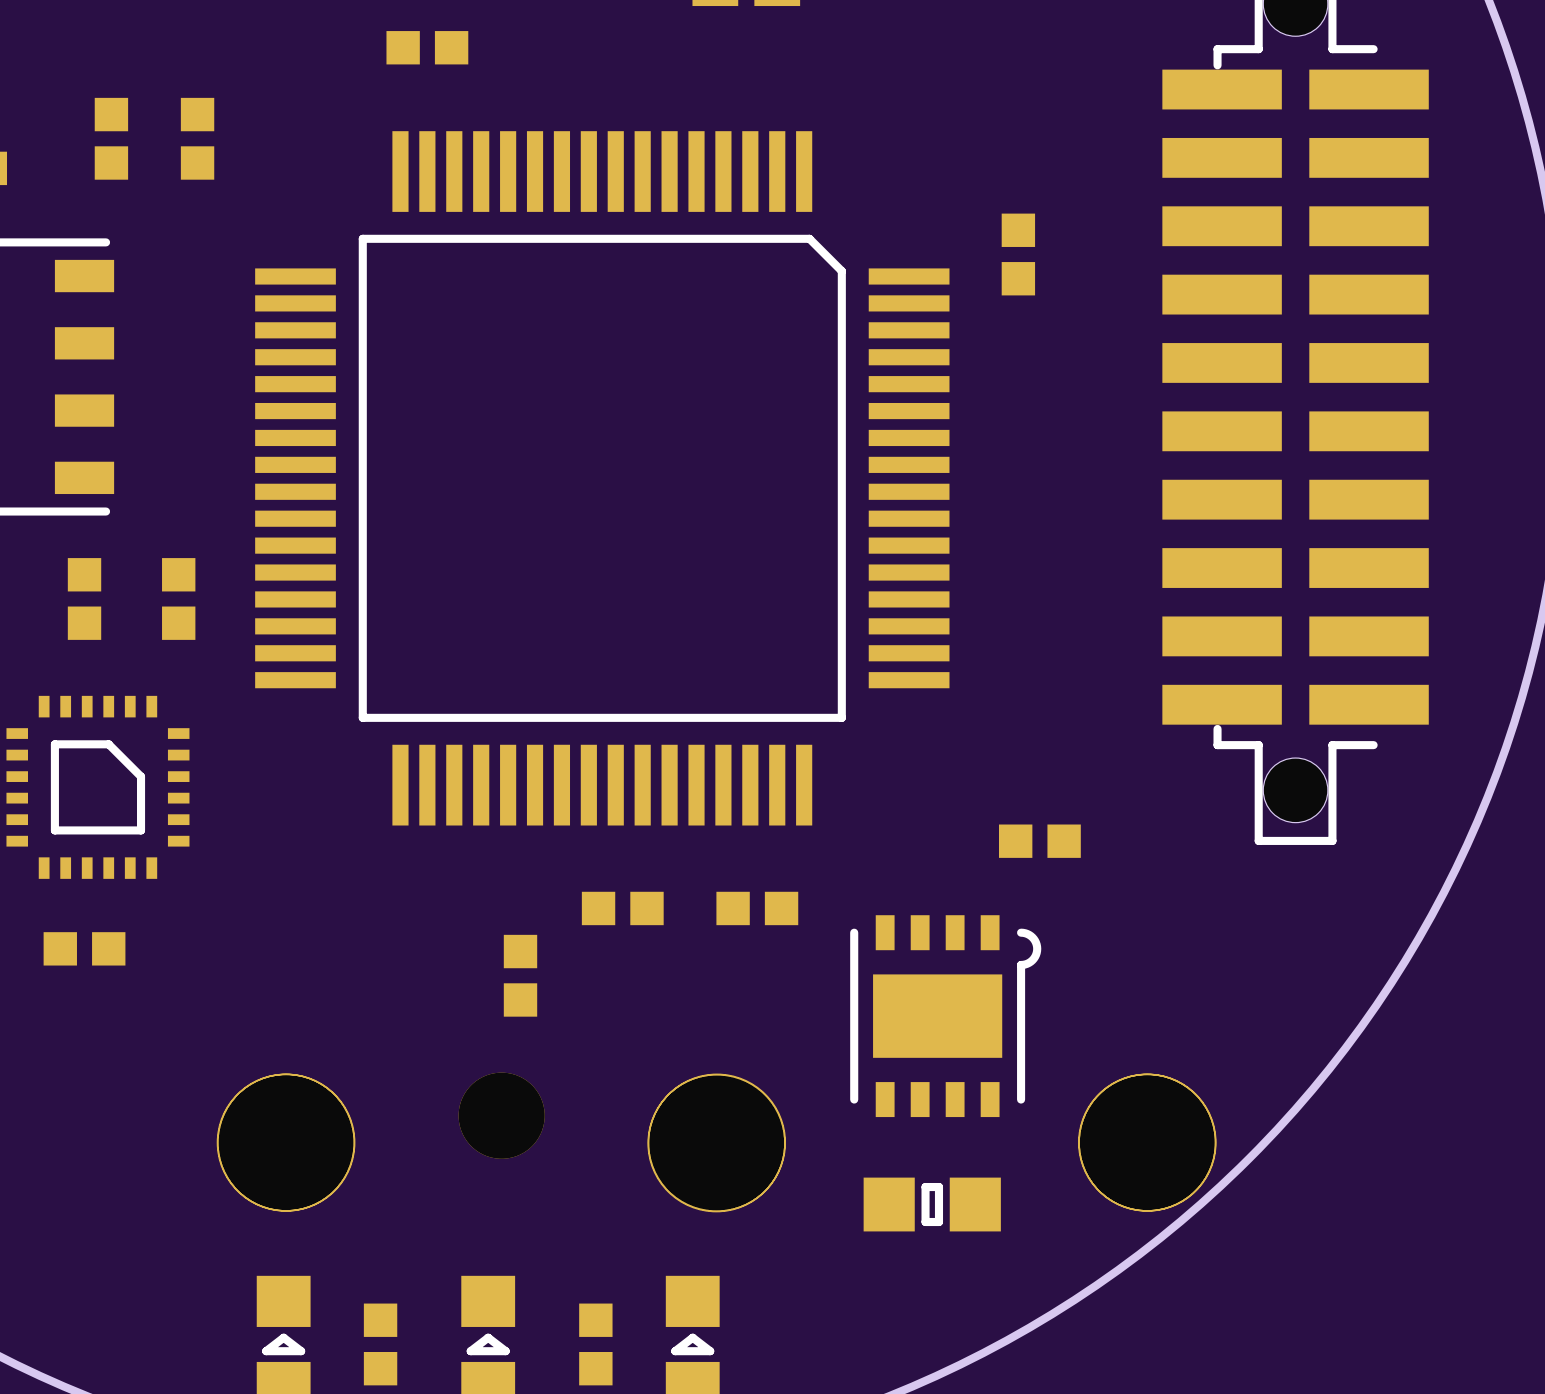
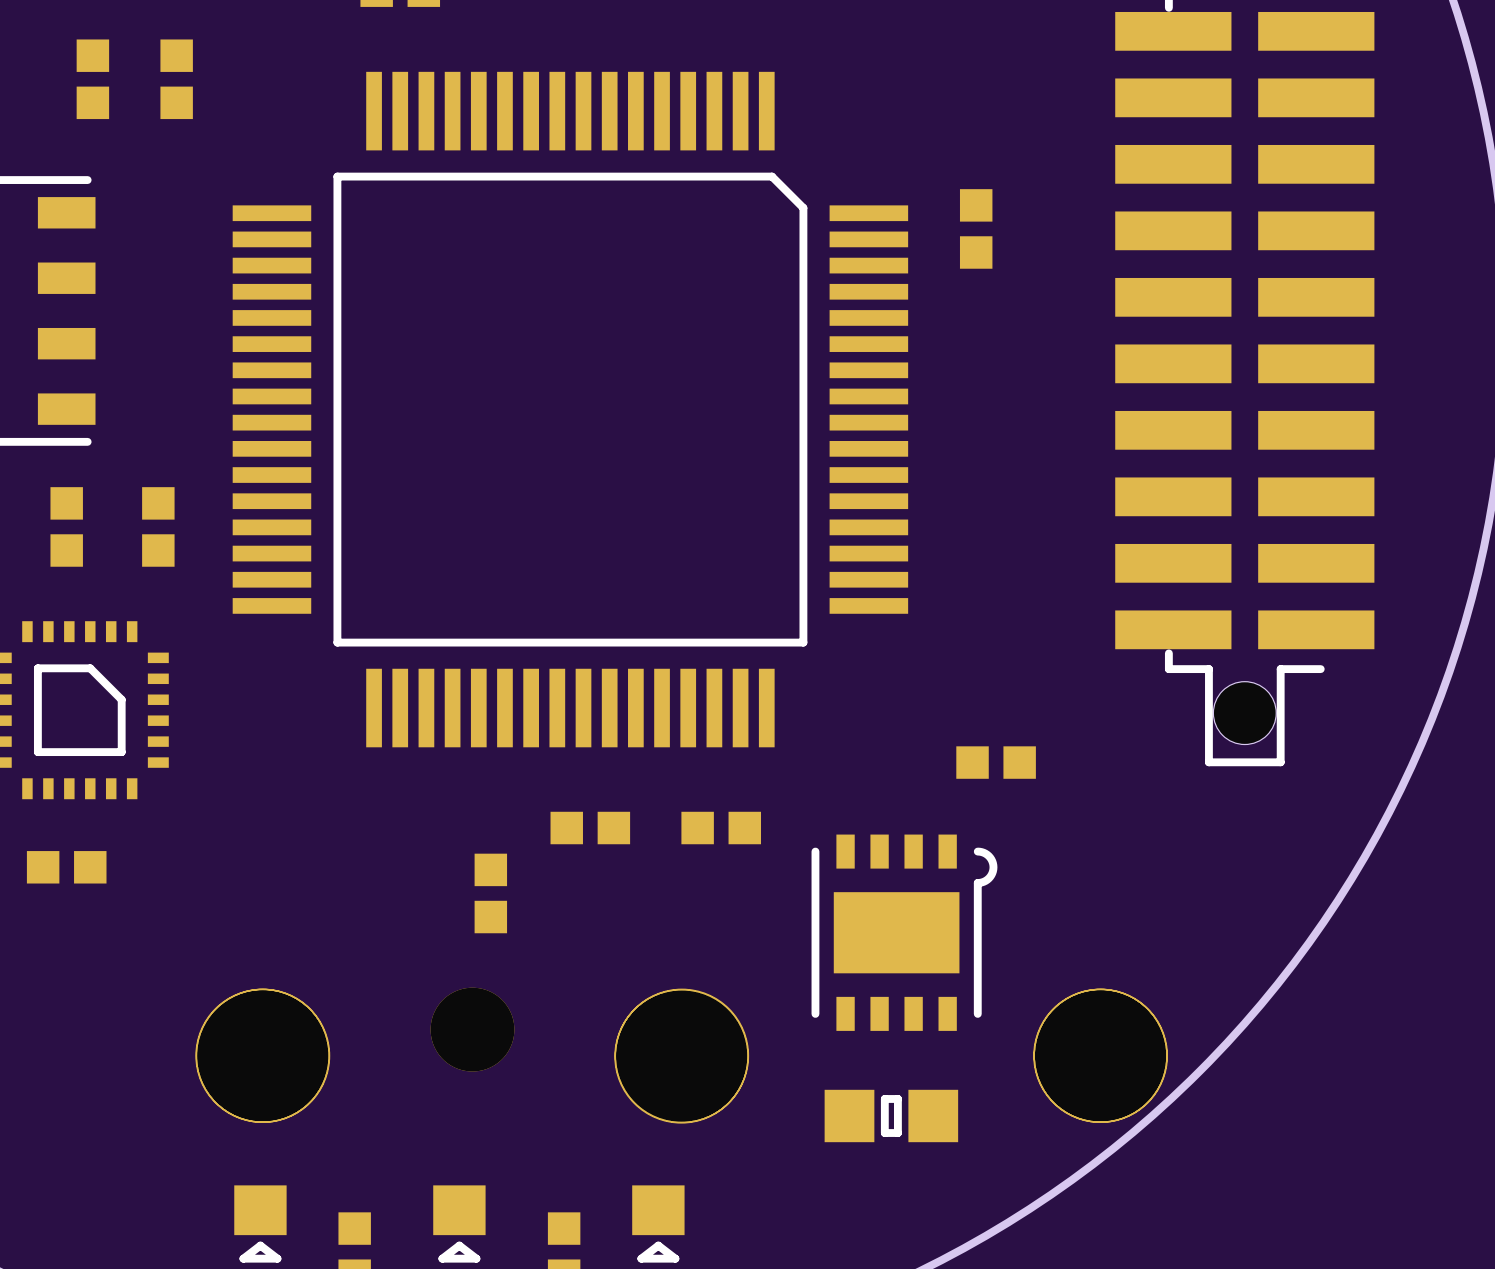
part position: (1018, 254) -> (976, 228)

